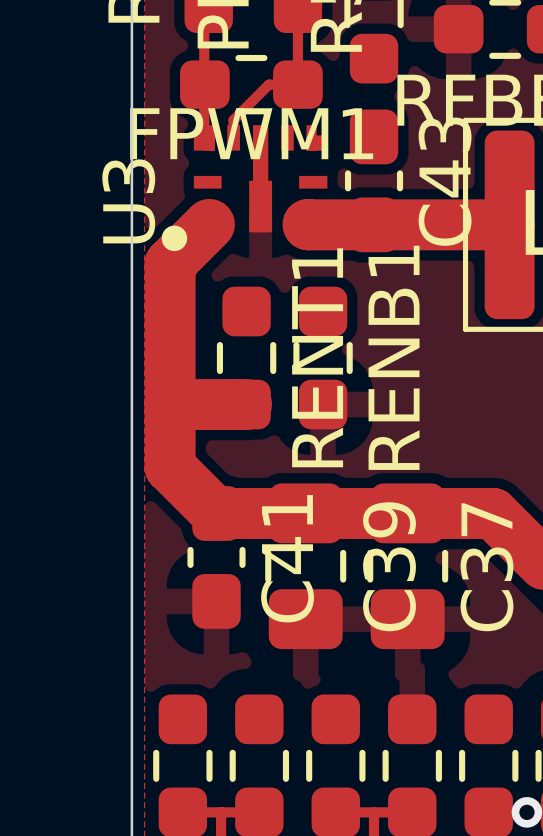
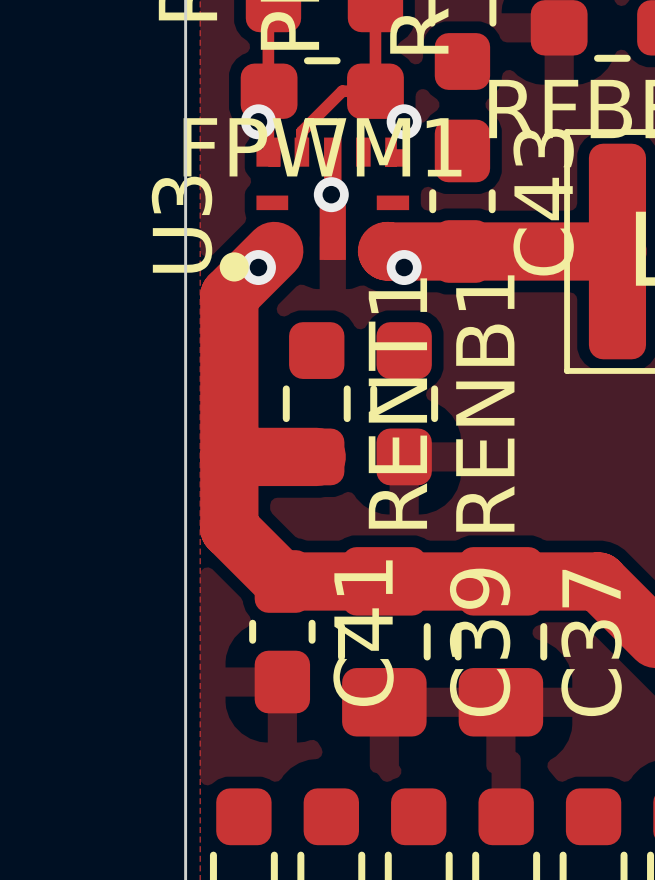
via: none -> (258, 121)
via: none -> (404, 121)
via: none -> (331, 194)
via: none -> (258, 267)
via: none -> (404, 267)

